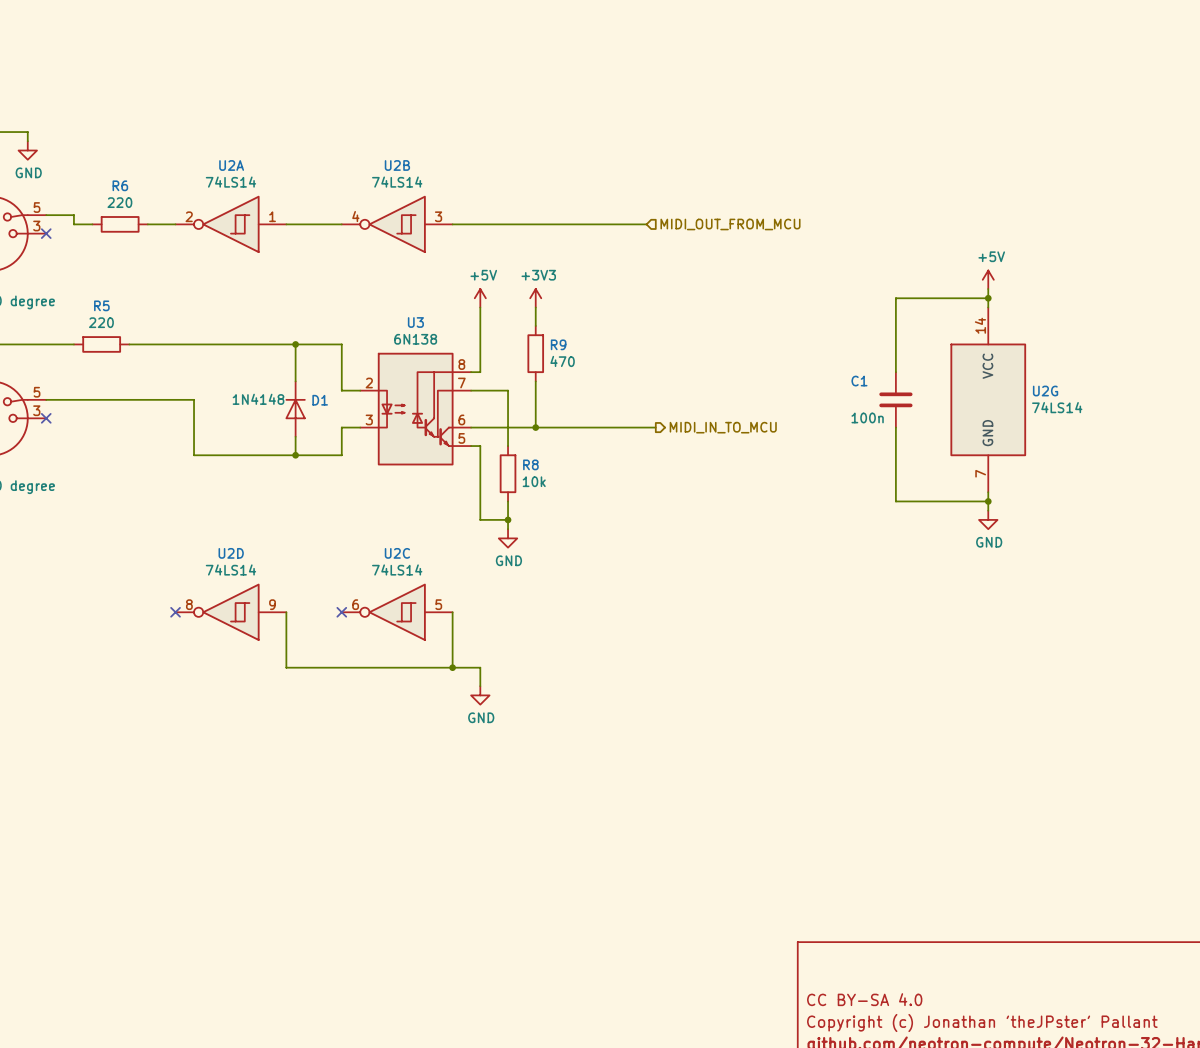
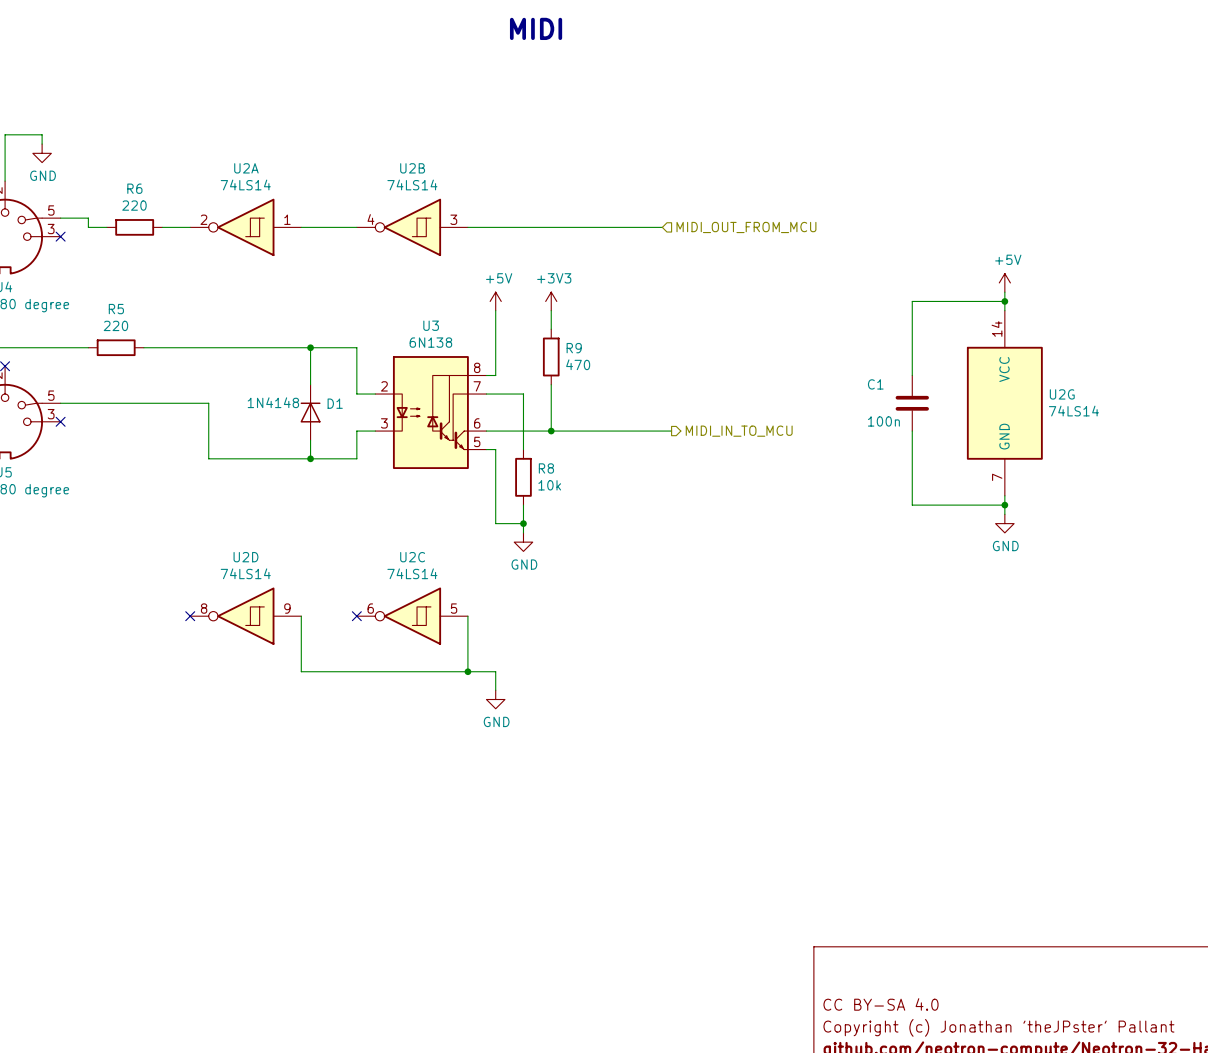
text: none -> MIDI (536, 28)

